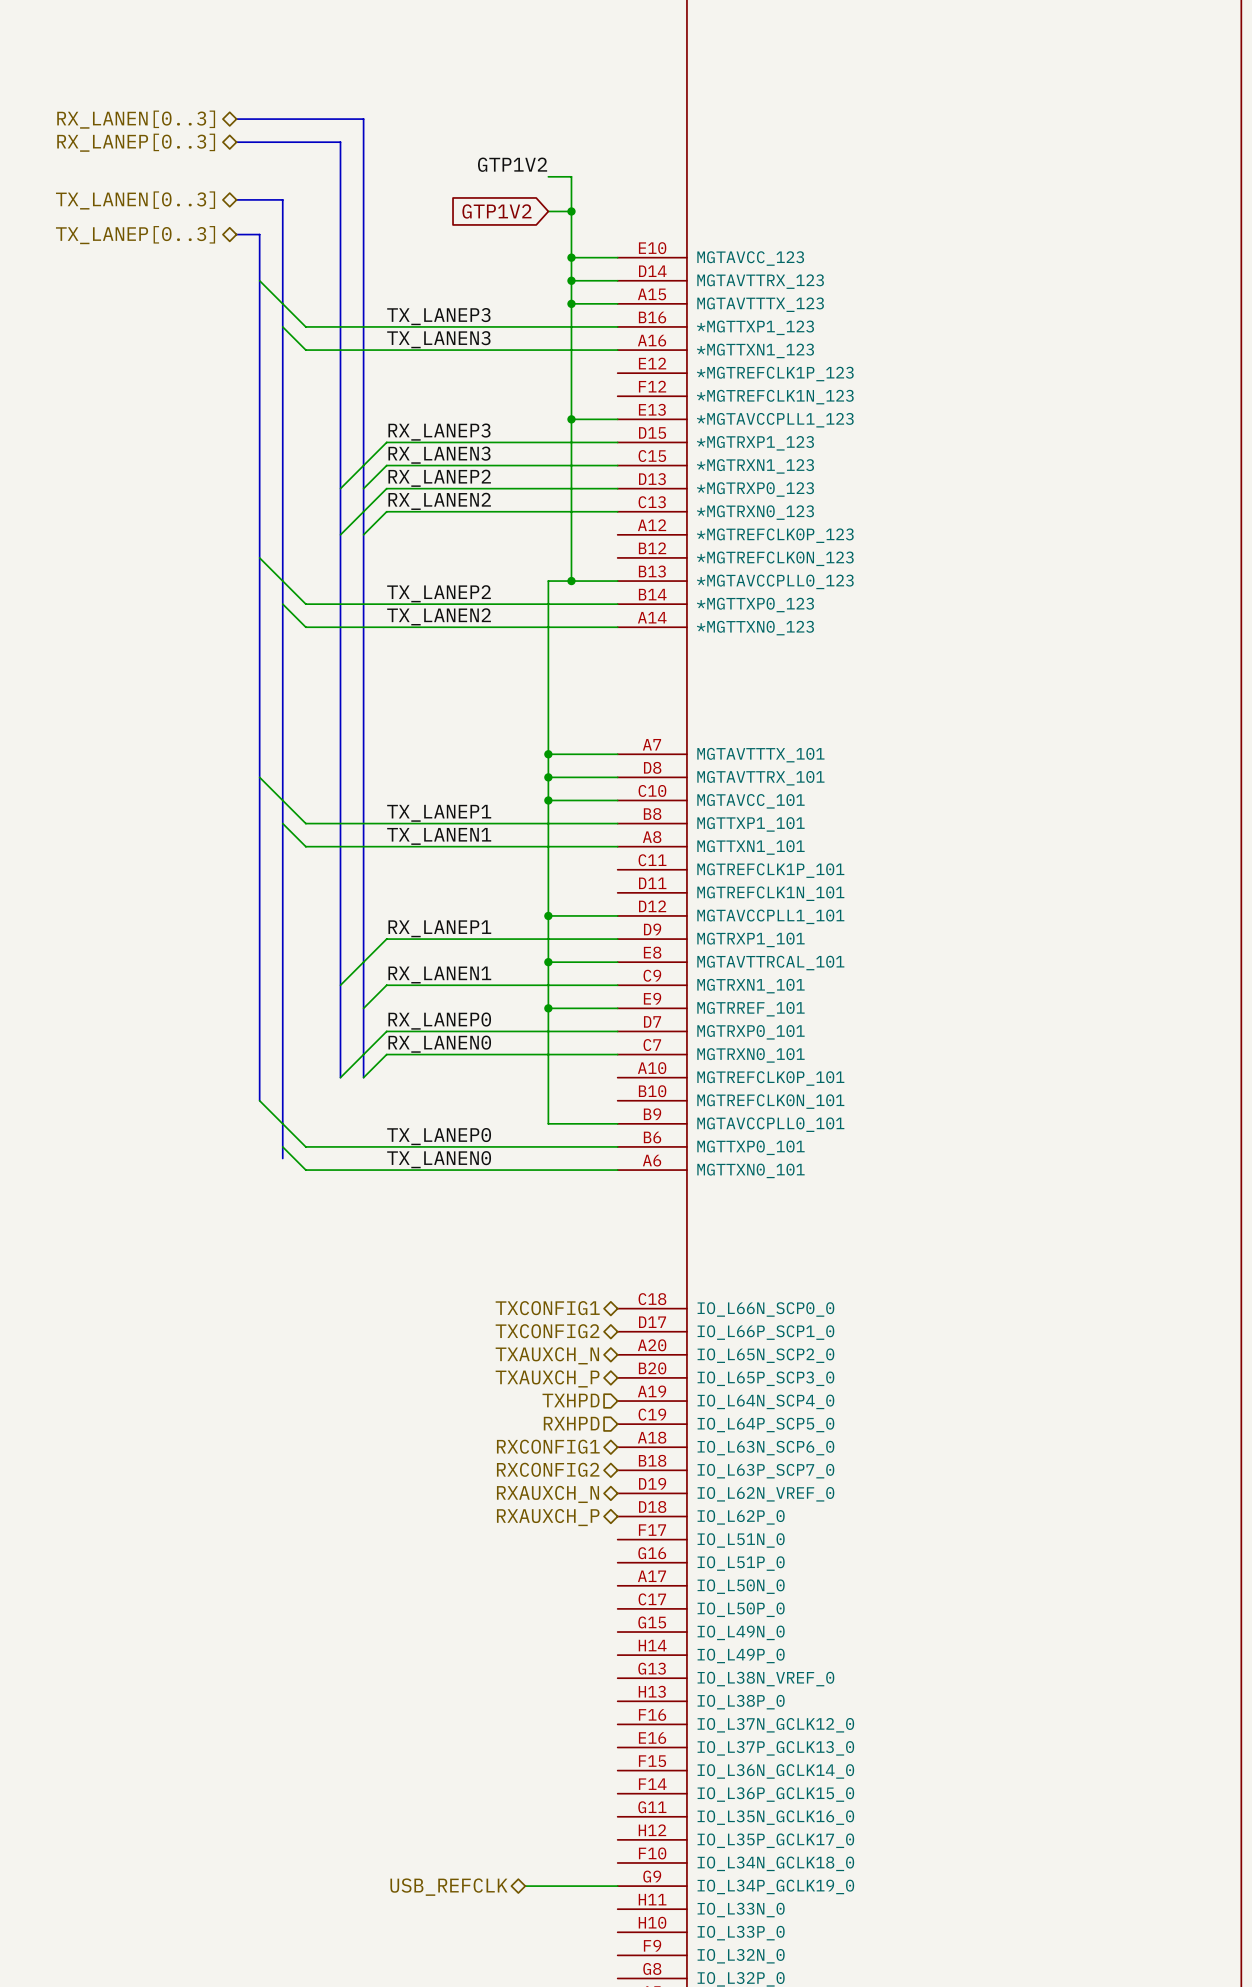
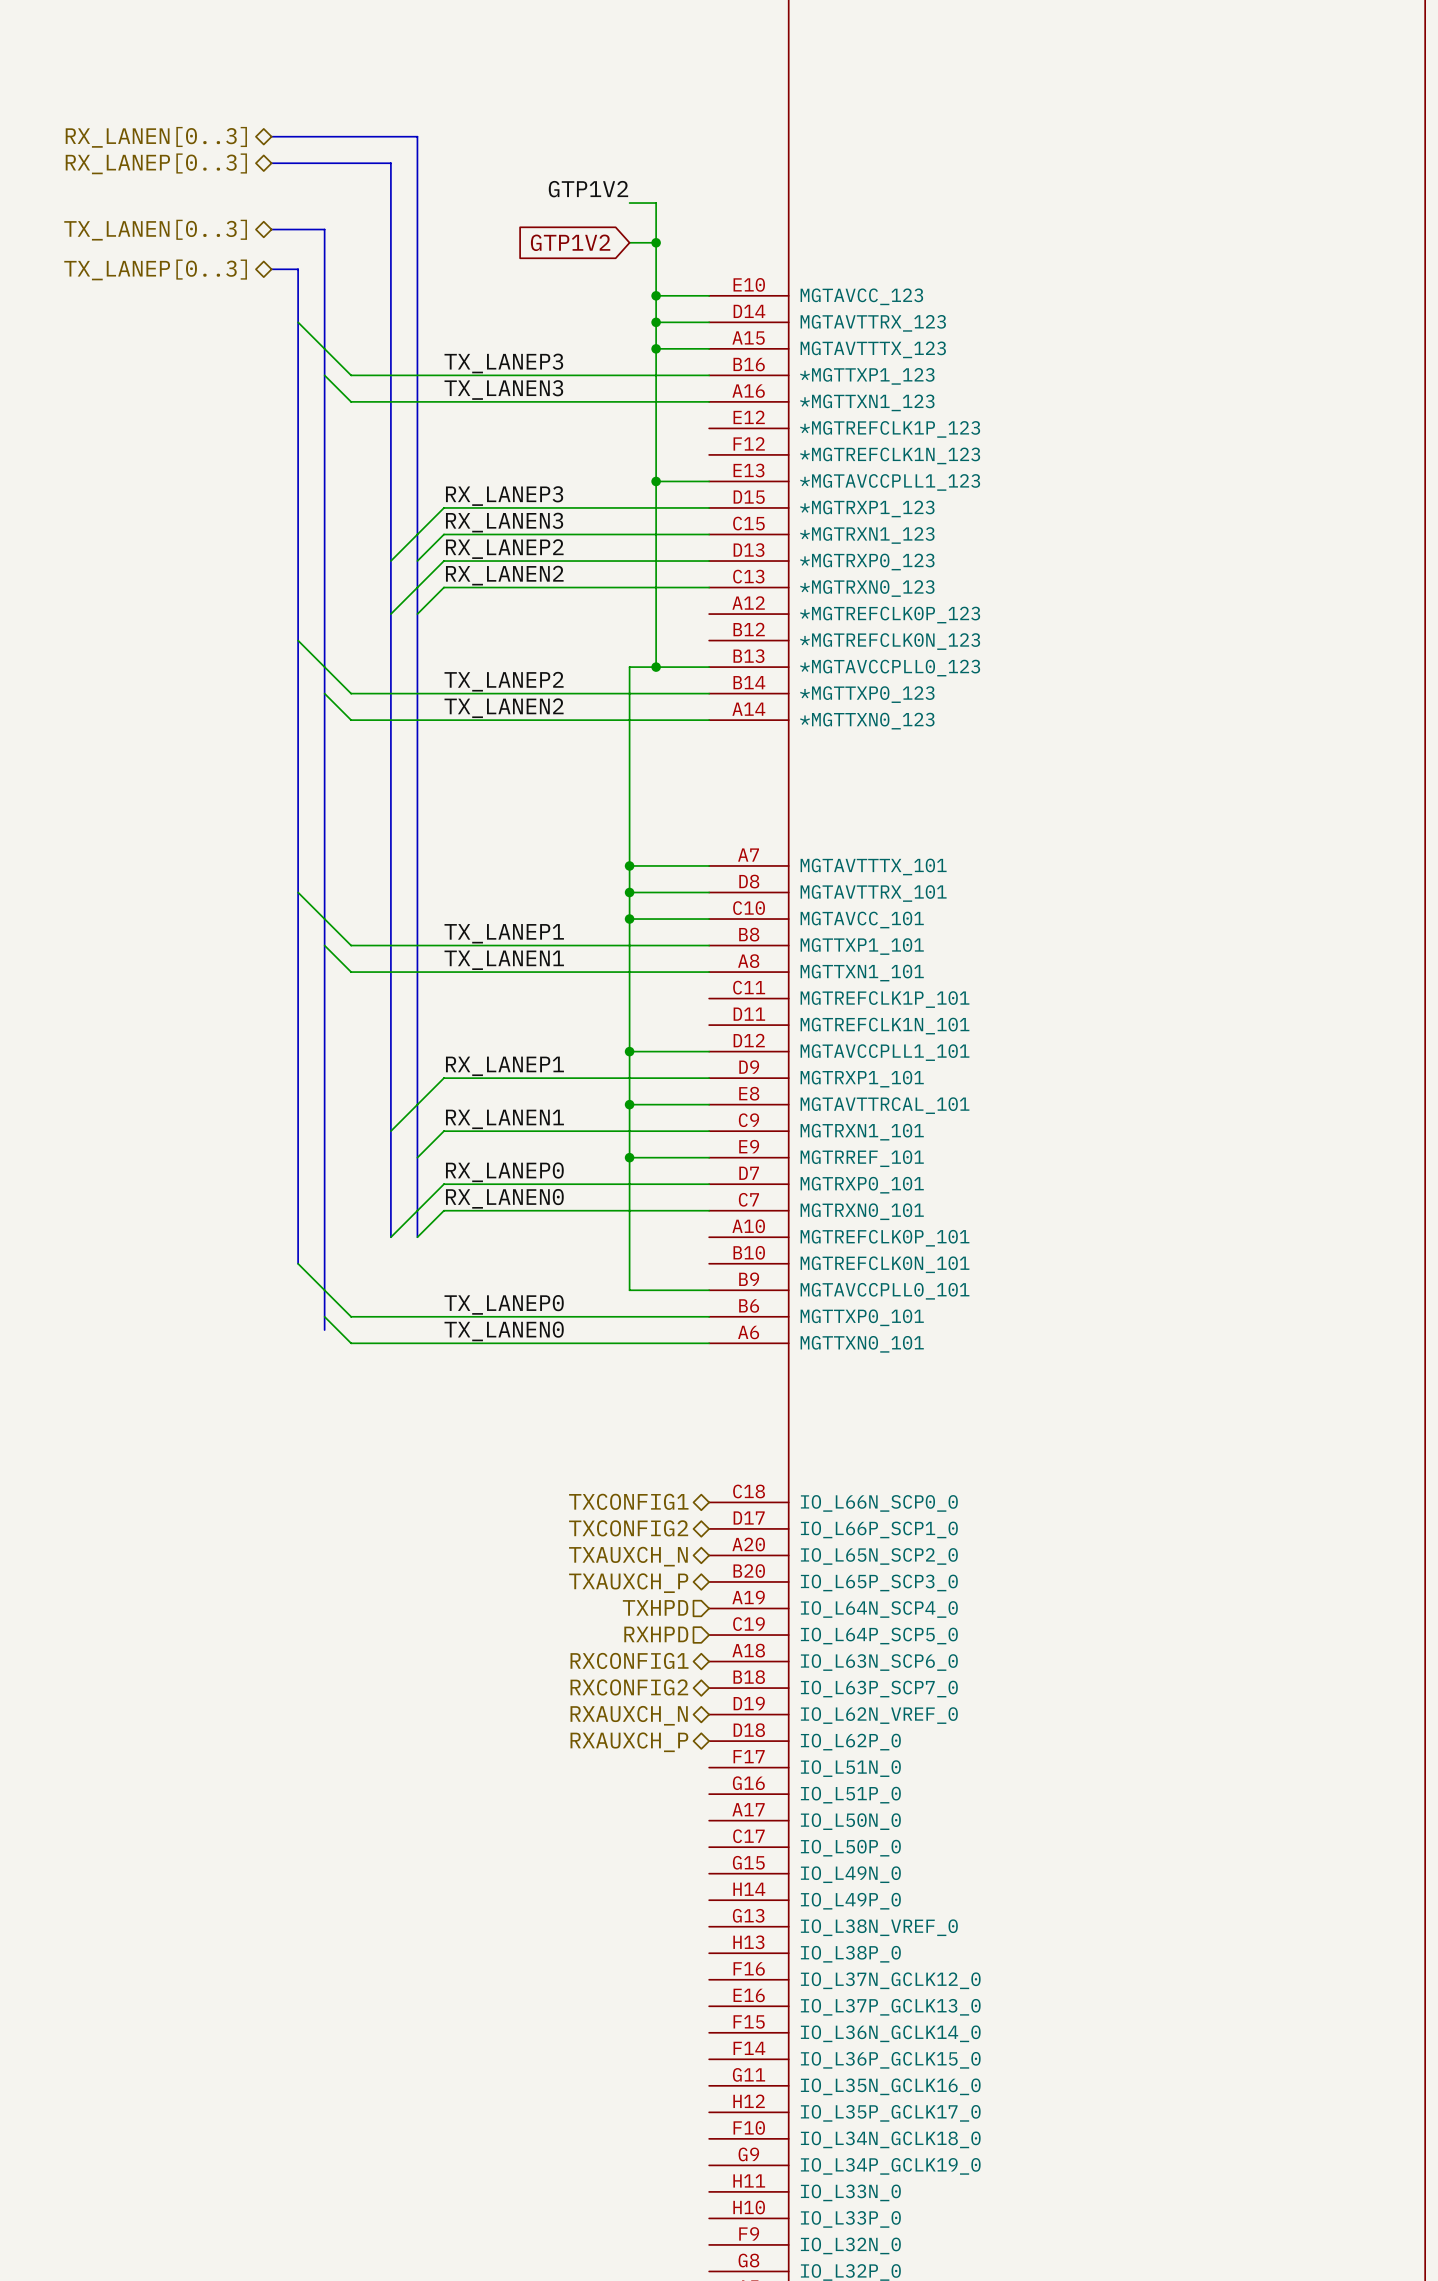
wire: (525, 1886) (617, 1886) -> none
hierarchical label: USB_REFCLK (448, 1887) -> none

